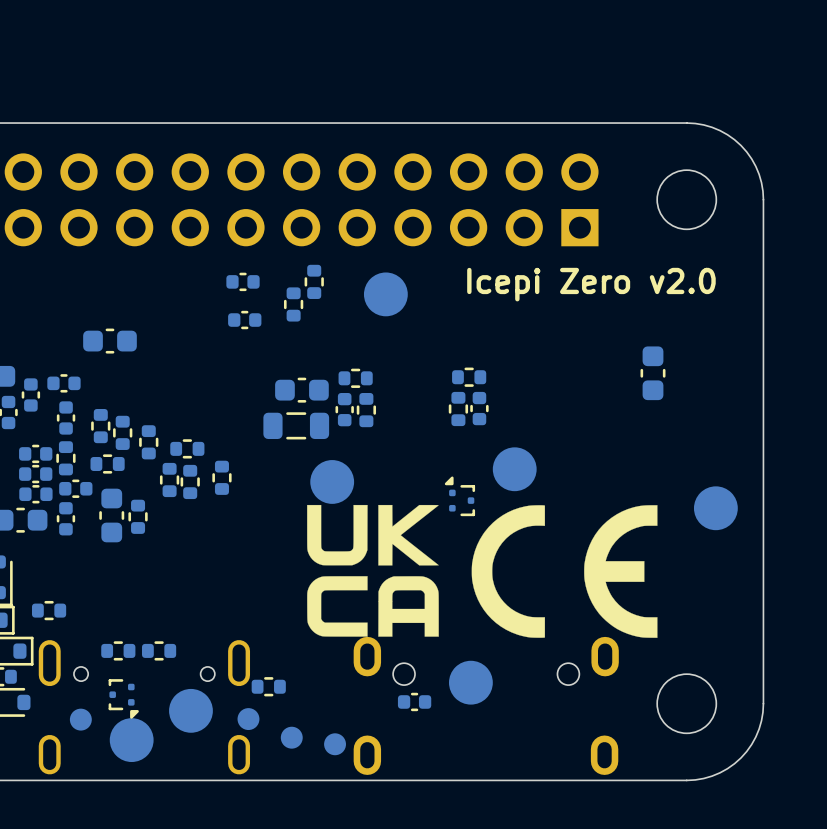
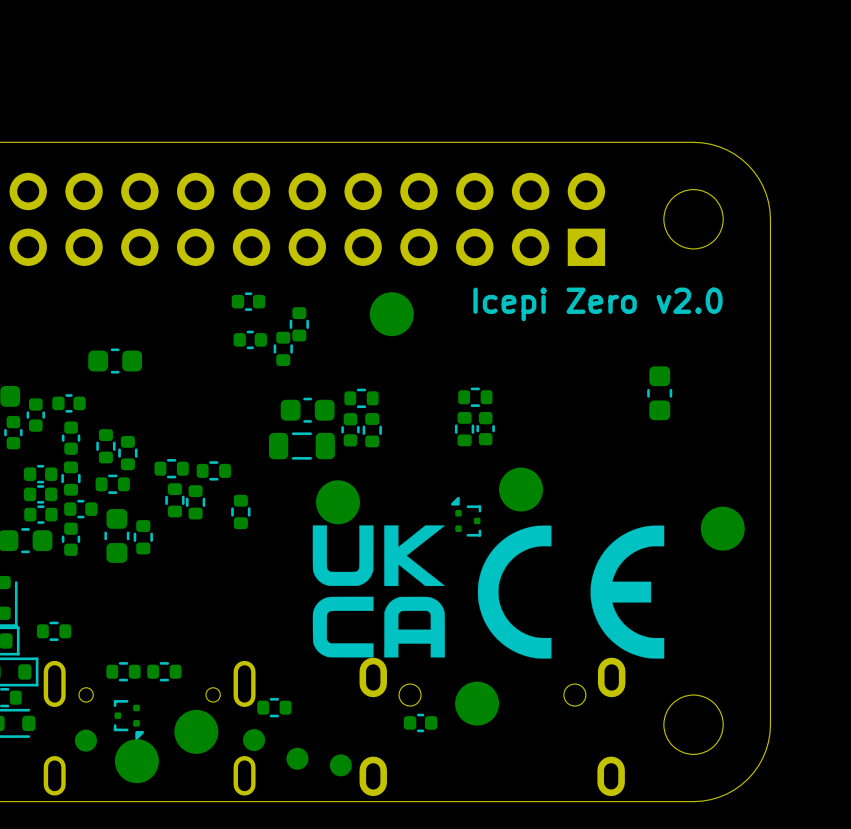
part position: (314, 281) -> (283, 348)
part: (148, 442) -> none
part: none -> (171, 468)
part: (187, 448) -> none
part: none -> (213, 470)
part: (221, 477) -> none
part: none -> (240, 511)

